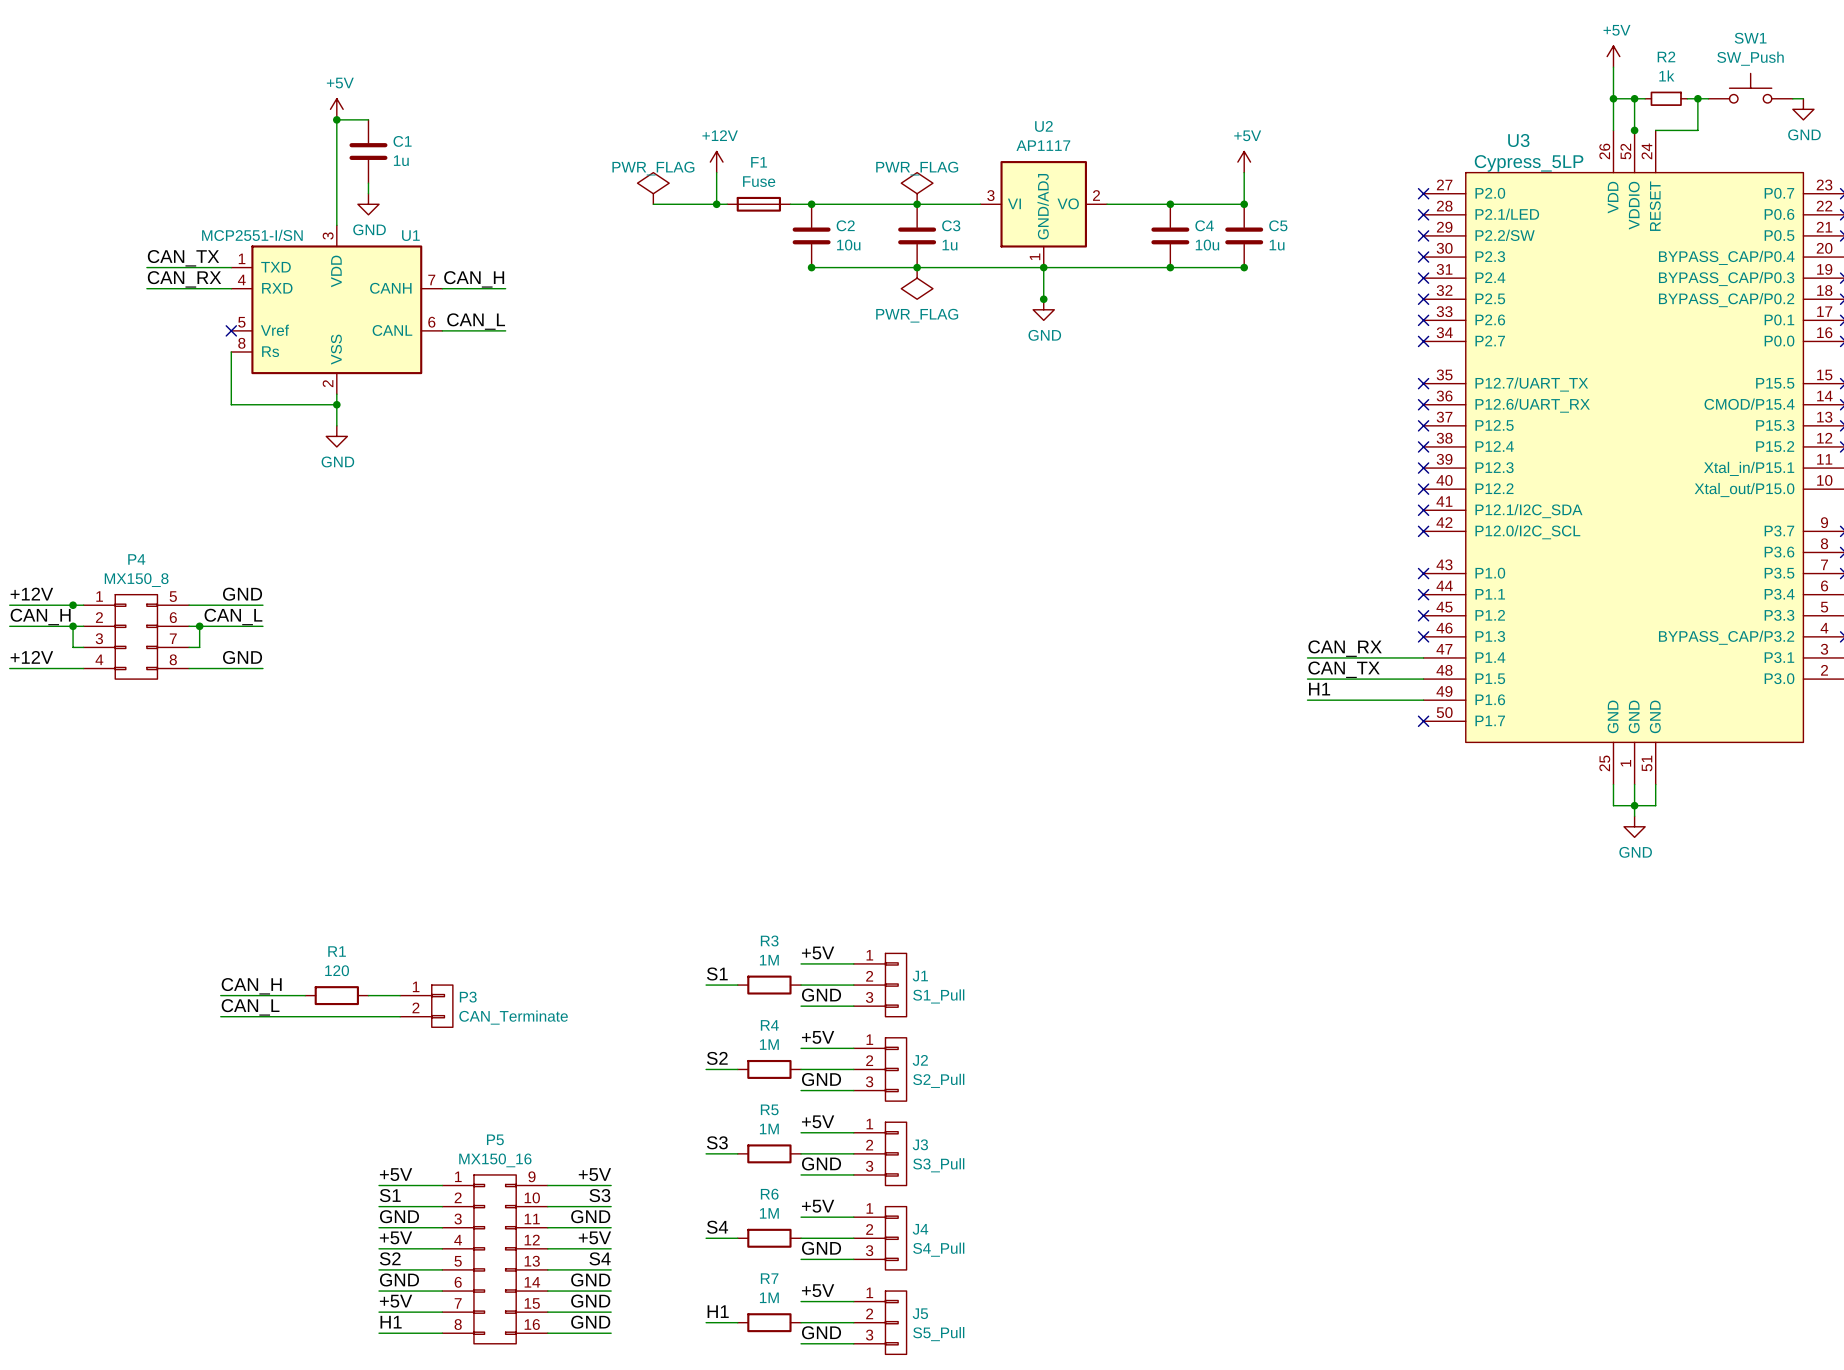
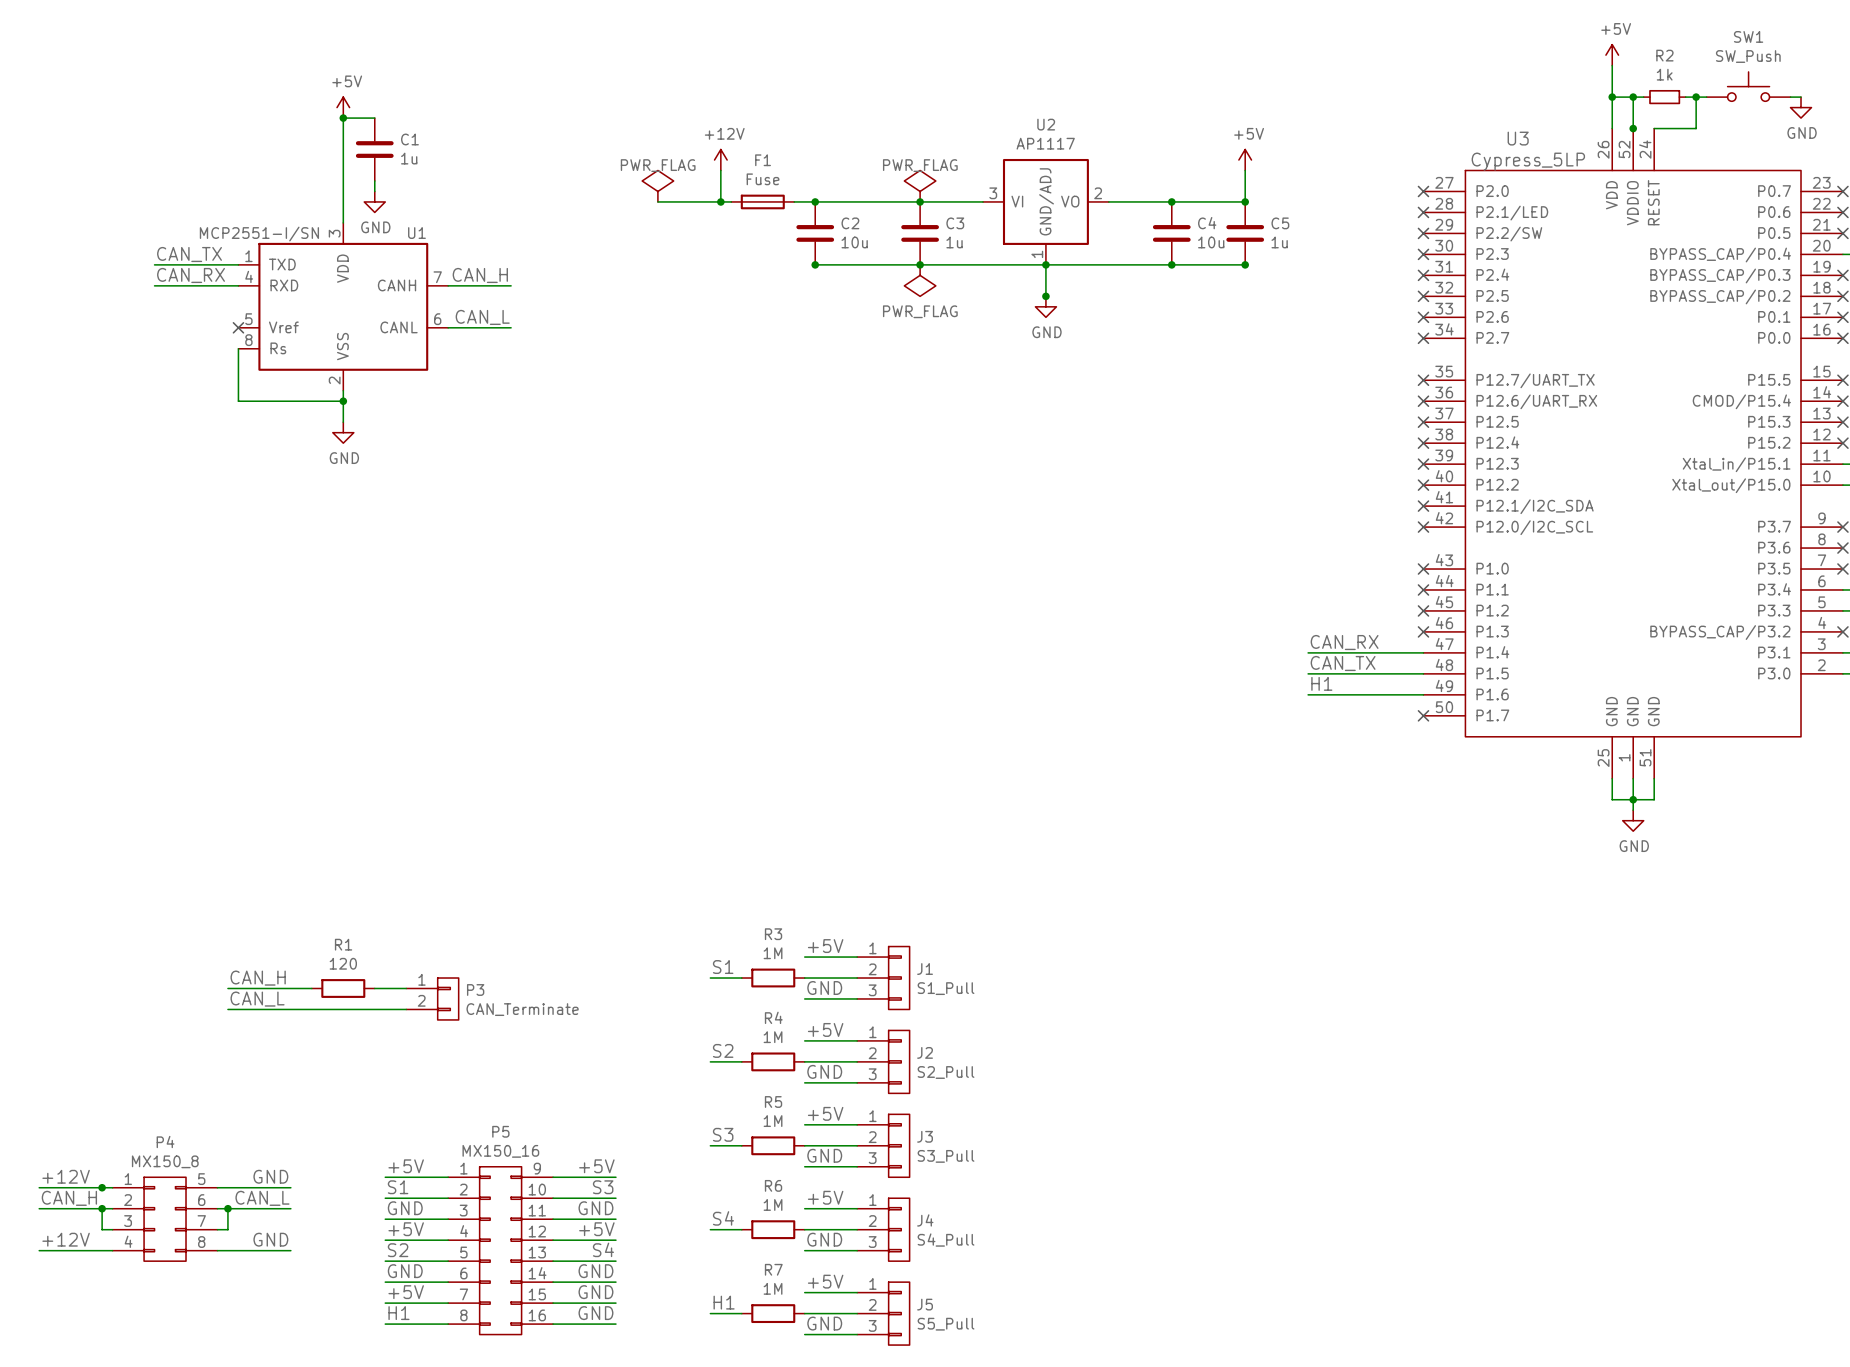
label: +12V (31, 594) -> none
label: GND (242, 594) -> none
wire: (9, 605) (83, 605) -> none
junction: (73, 605) -> none
wire: (189, 605) (262, 605) -> none
label: CAN_H (40, 617) -> none
label: CAN_L (233, 617) -> none
wire: (9, 626) (83, 626) -> none
wire: (73, 626) (73, 647) (83, 647) -> none
junction: (73, 626) -> none
wire: (189, 626) (262, 626) -> none
wire: (199, 626) (199, 647) (189, 647) -> none
junction: (199, 626) -> none
P4 position: (136, 636) -> (165, 1219)
label: +12V (31, 657) -> none
label: GND (242, 657) -> none
wire: (9, 668) (83, 668) -> none
wire: (189, 668) (262, 668) -> none
label: none -> +12V (66, 1176)
label: none -> GND (270, 1176)
wire: none -> (39, 1187) (112, 1187)
junction: none -> (102, 1187)
wire: none -> (217, 1187) (290, 1187)
label: none -> CAN_H (69, 1198)
label: none -> CAN_L (262, 1198)
wire: none -> (39, 1208) (112, 1208)
wire: none -> (102, 1208) (102, 1229) (112, 1229)
junction: none -> (102, 1208)
wire: none -> (217, 1208) (290, 1208)
wire: none -> (227, 1208) (227, 1229) (217, 1229)
junction: none -> (227, 1208)
label: none -> +12V (66, 1239)
label: none -> GND (270, 1239)
wire: none -> (39, 1250) (112, 1250)
wire: none -> (217, 1250) (290, 1250)

